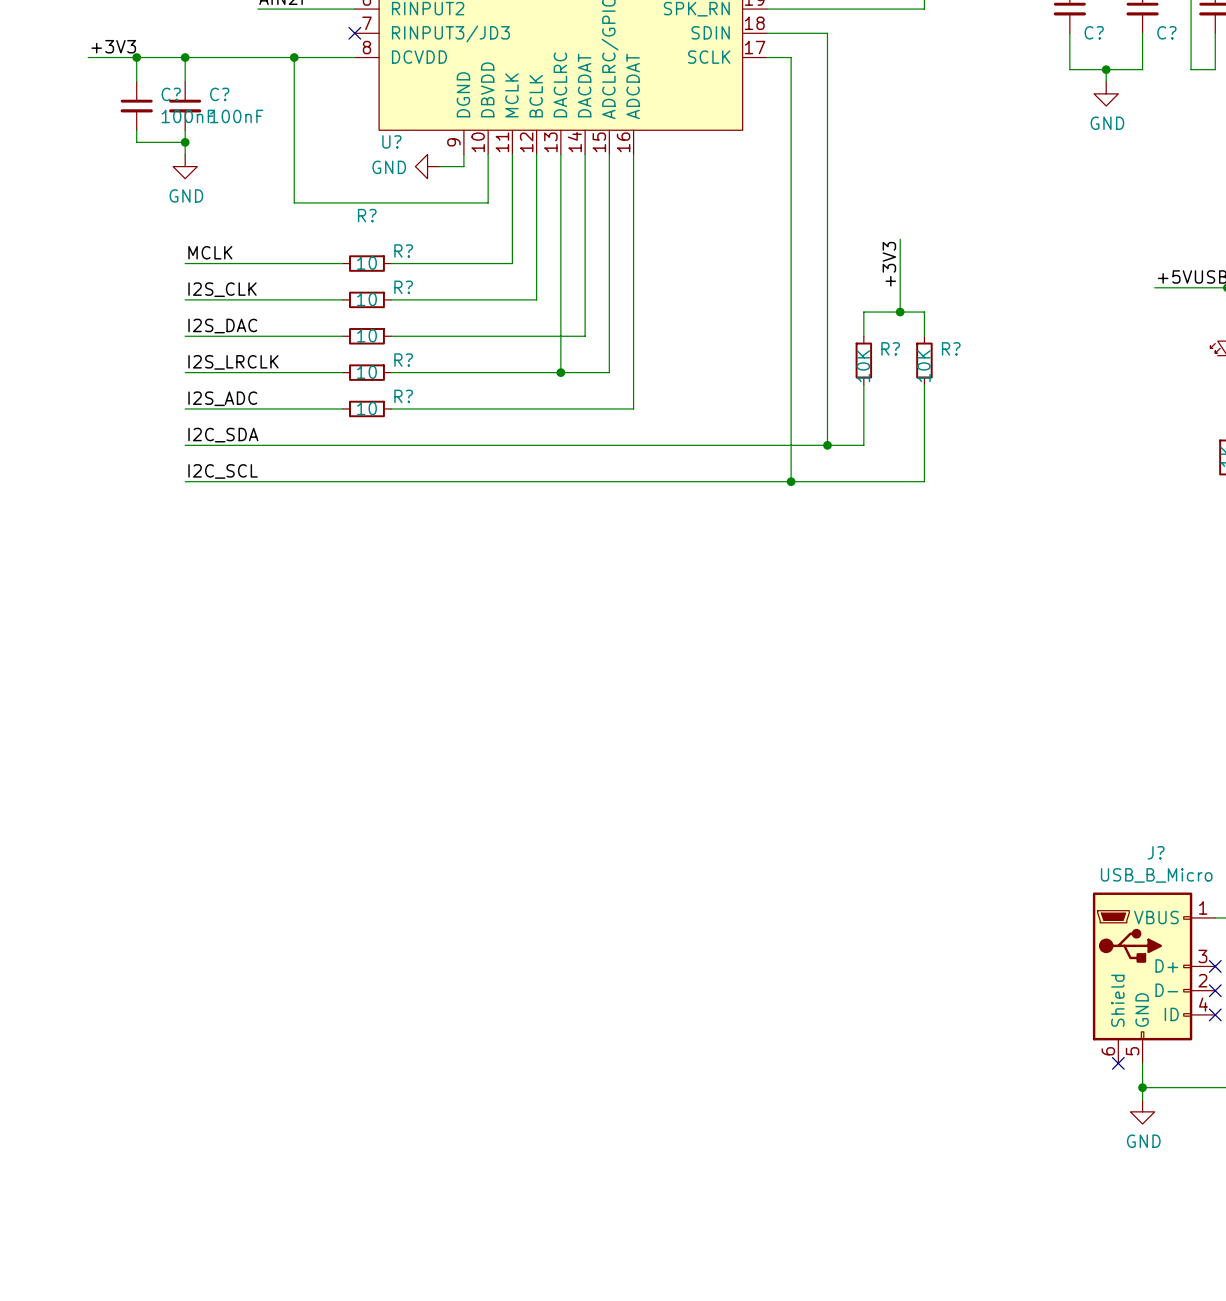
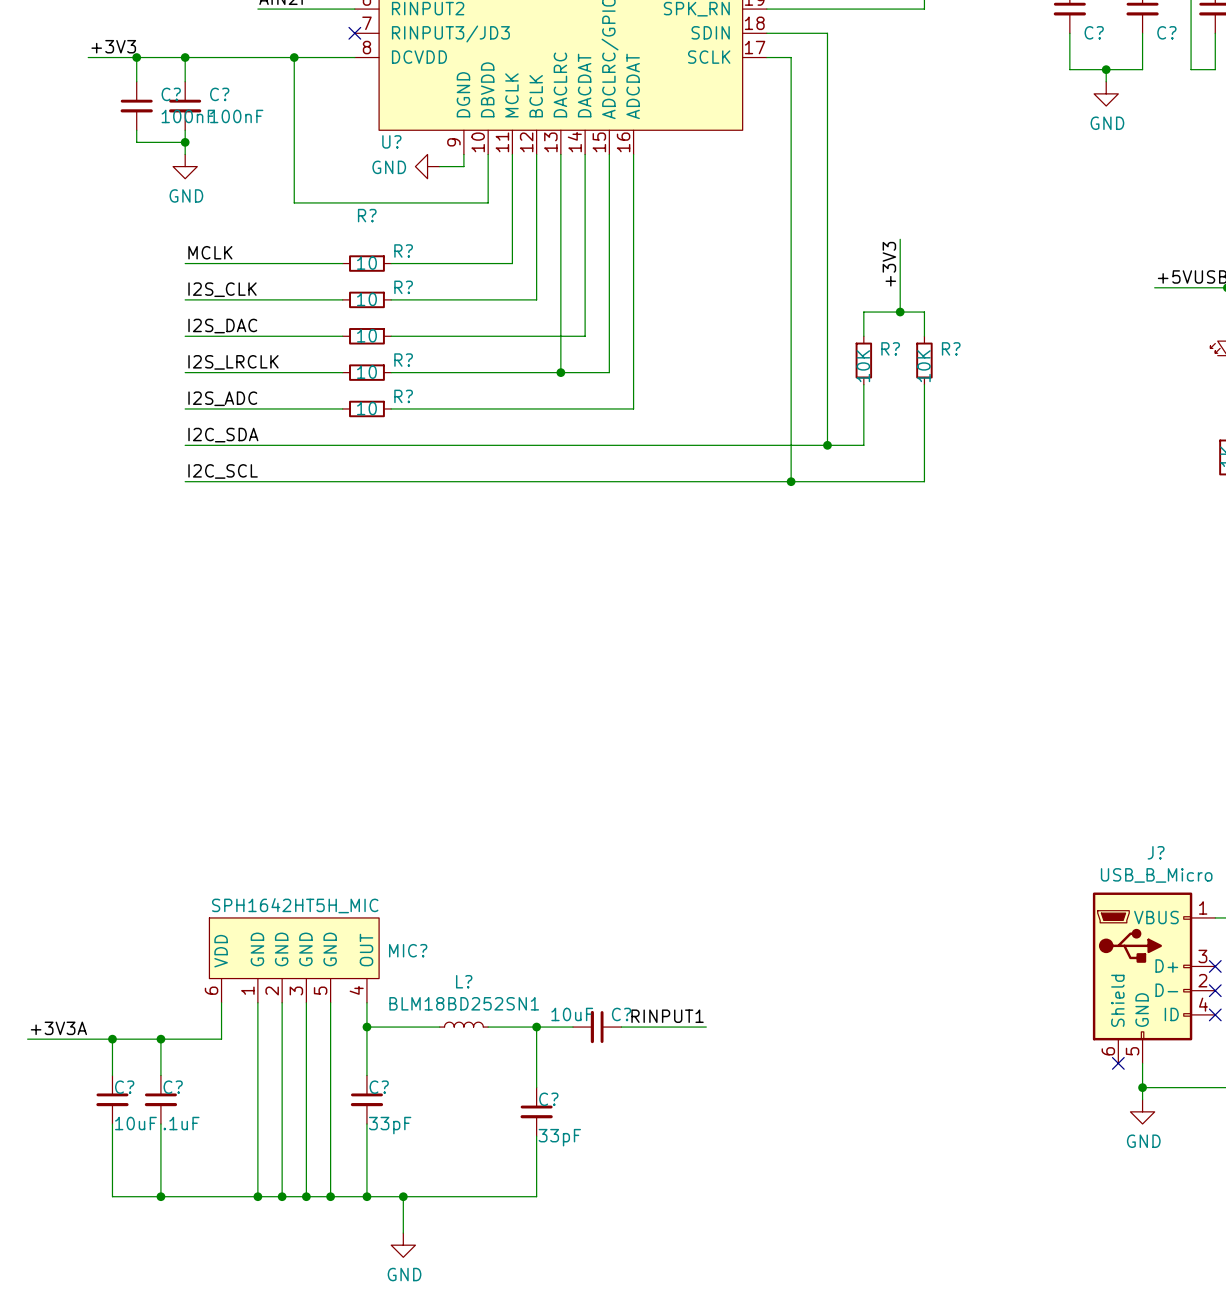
MIC?: none -> SPH1642HT5H_MIC (294, 960)
wire: none -> (221, 1002) (221, 1039) (27, 1039)
wire: none -> (257, 1002) (257, 1196)
wire: none -> (282, 1002) (282, 1196)
wire: none -> (306, 1002) (306, 1196)
wire: none -> (330, 1002) (330, 1196)
wire: none -> (366, 1002) (366, 1075)
label: none -> RINPUT1 (667, 1016)
L?: none -> BLM18BD252SN1 (463, 1024)
wire: none -> (366, 1027) (439, 1027)
junction: none -> (366, 1027)
wire: none -> (488, 1027) (572, 1027)
wire: none -> (536, 1027) (536, 1087)
junction: none -> (536, 1027)
C?: none -> 10uF (597, 1027)
wire: none -> (621, 1027) (706, 1027)
label: none -> +3V3A (58, 1028)
wire: none -> (112, 1039) (112, 1075)
junction: none -> (112, 1039)
wire: none -> (160, 1039) (160, 1075)
junction: none -> (160, 1039)
C?: none -> 10uF (112, 1099)
C?: none -> .1uF (160, 1099)
C?: none -> 33pF (366, 1099)
C?: none -> 33pF (536, 1111)
wire: none -> (112, 1123) (112, 1196) (536, 1196) (536, 1136)
wire: none -> (160, 1123) (160, 1196)
wire: none -> (366, 1123) (366, 1196)
junction: none -> (160, 1196)
junction: none -> (257, 1196)
junction: none -> (282, 1196)
junction: none -> (306, 1196)
junction: none -> (330, 1196)
junction: none -> (366, 1196)
wire: none -> (403, 1196) (403, 1233)
junction: none -> (403, 1196)
power symbol: none -> GND (403, 1245)

